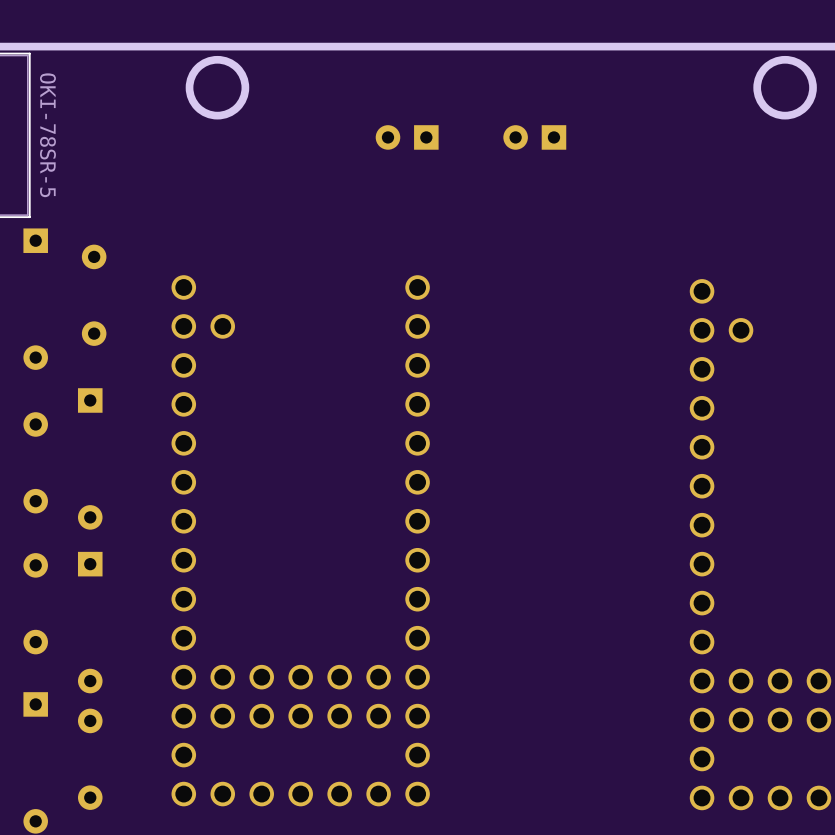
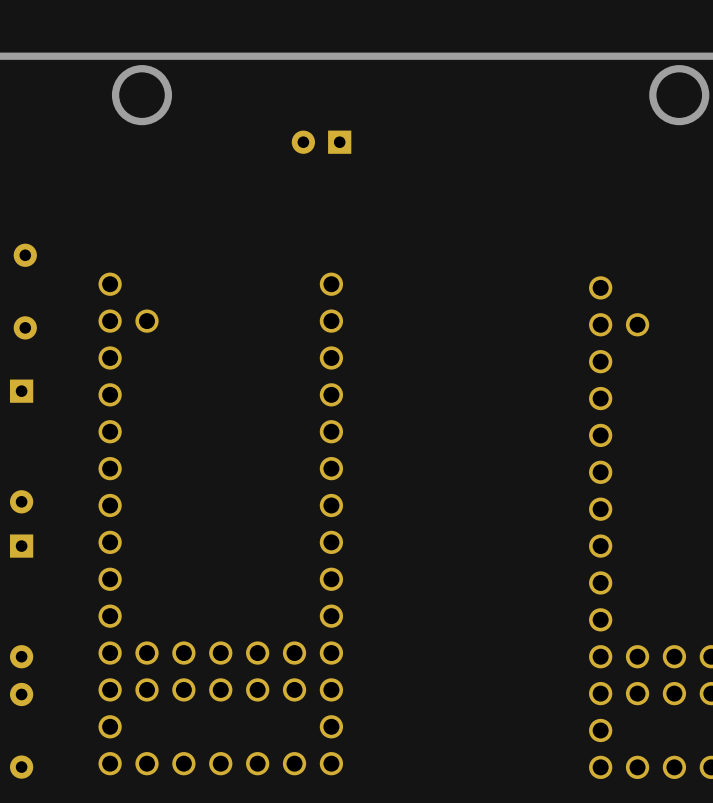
part: (534, 137) -> none

